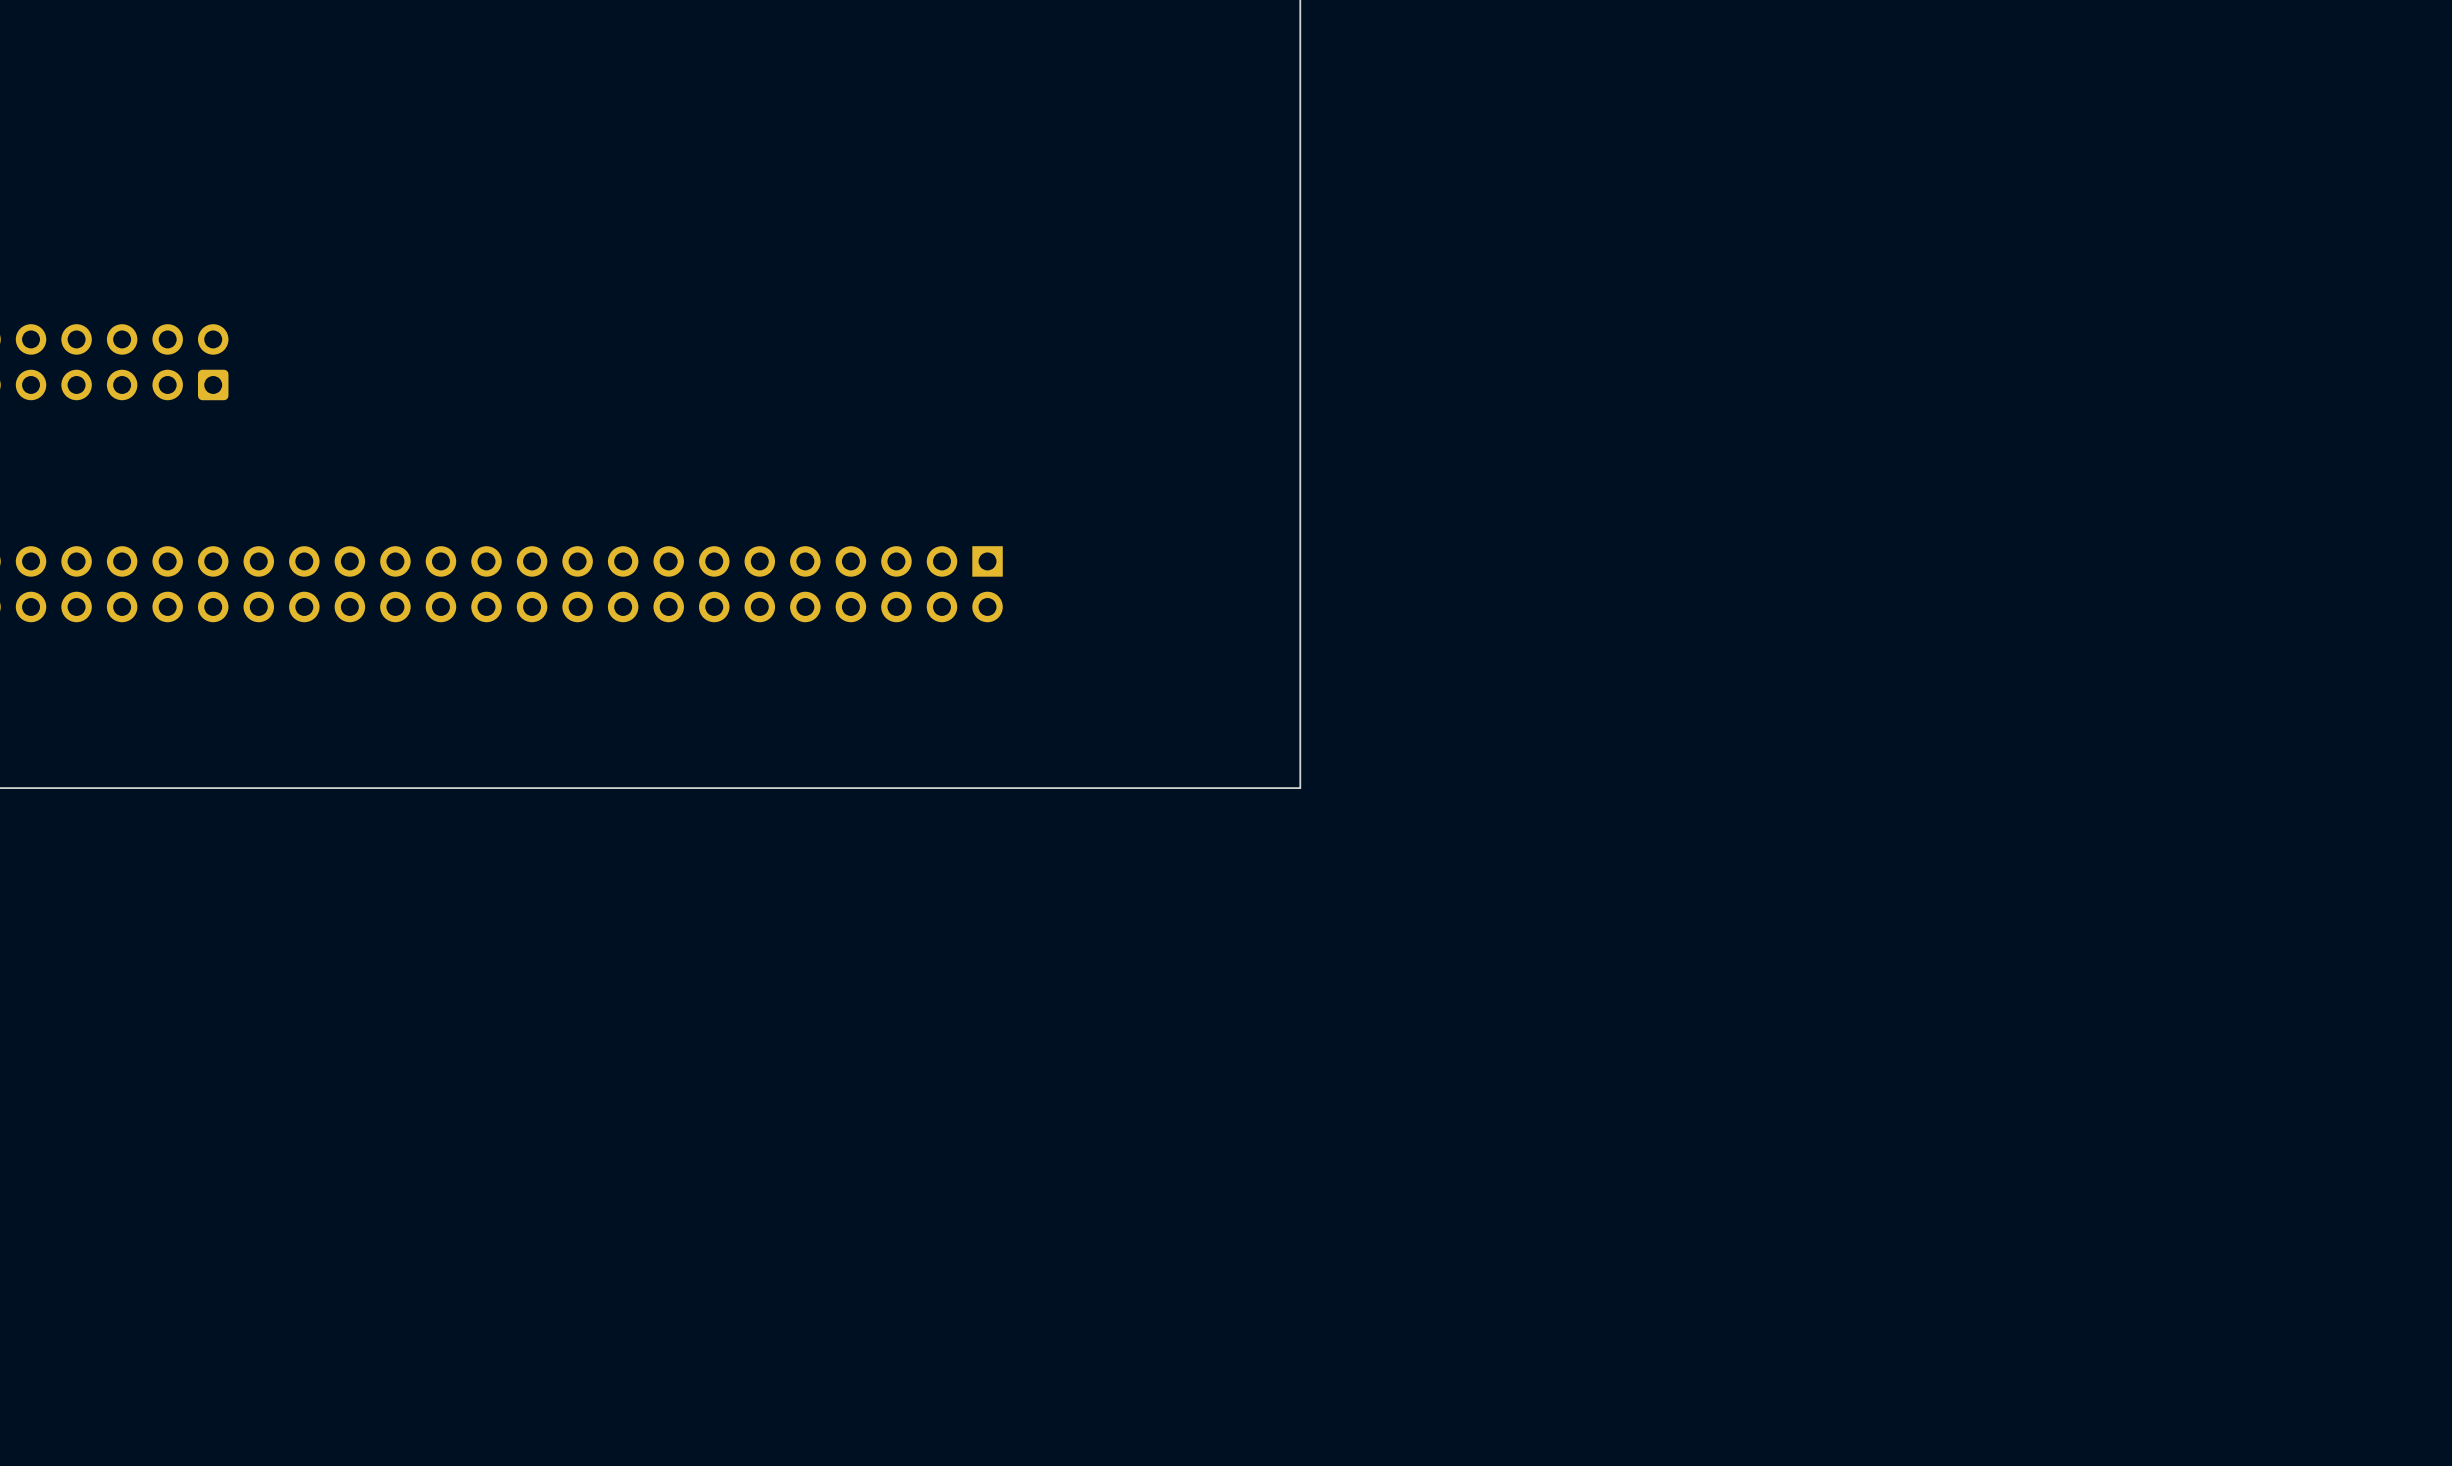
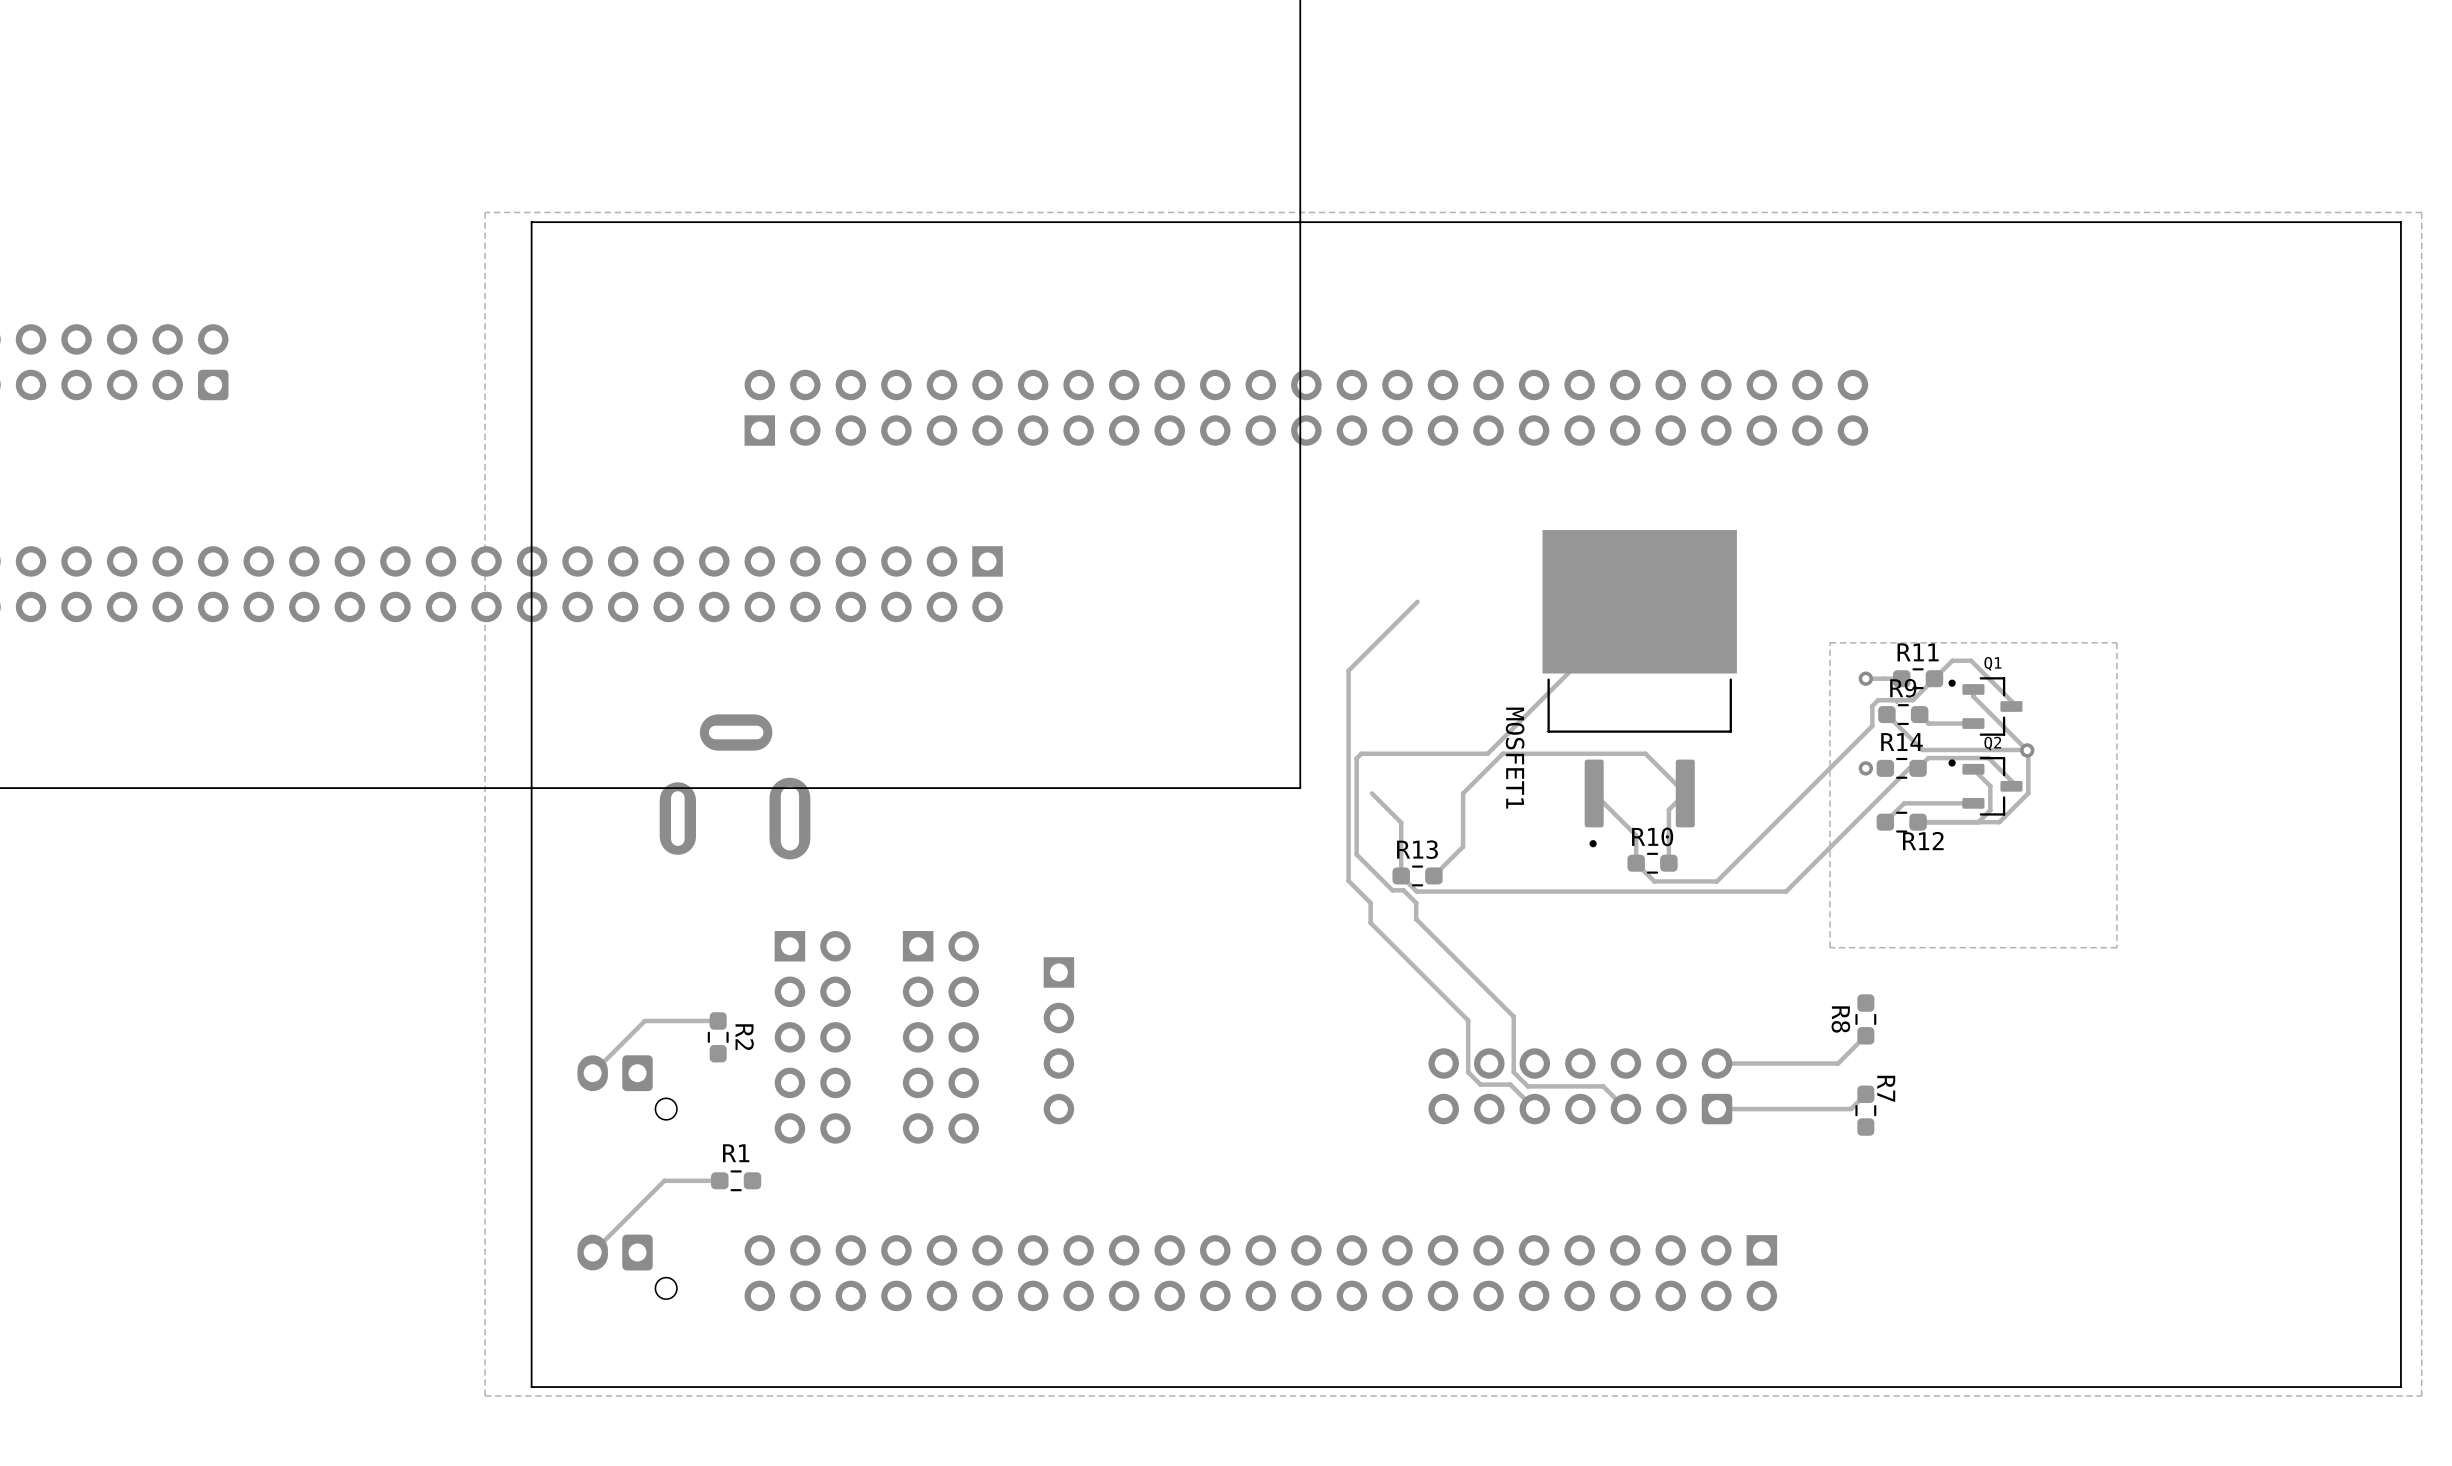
zone outline: none -> (2421, 212) (485, 212) (485, 1395) (2421, 1395) (2421, 212)
board edge: none -> (2400, 222) (2400, 1387) (531, 1387) (531, 222) (2400, 222)
part: none -> (1306, 407)
track: none -> (1417, 601) (1348, 670) (1348, 880) (1370, 903) (1370, 922) (1468, 1020) (1468, 1072) (1480, 1084) (1510, 1084) (1534, 1109)
track: none -> (1639, 601) (1487, 753) (1361, 753) (1356, 758) (1356, 854) (1392, 890) (1403, 890) (1416, 903) (1416, 919) (1513, 1016) (1513, 1072) (1527, 1086) (1603, 1086) (1625, 1109)
zone outline: none -> (2116, 642) (2116, 947) (1829, 947) (1829, 642) (2116, 642)
via: none -> (1865, 678)
track: none -> (1901, 678) (1865, 678)
R11: none -> (1918, 678)
MOSFET1: none -> (1639, 688)
track: none -> (1973, 689) (1973, 696) (2028, 751) (2028, 793) (1999, 822) (1918, 822)
Q1: none -> (1985, 706)
track: none -> (2011, 706) (2011, 701) (1971, 660) (1952, 660) (1912, 700) (1878, 700) (1872, 706) (1872, 726) (1716, 881) (1654, 881) (1636, 863) (1636, 835) (1594, 793)
track: none -> (1886, 714) (1922, 749) (2026, 749)
R9: none -> (1903, 714)
track: none -> (1919, 714) (1928, 723) (1973, 723)
via: none -> (2027, 750)
via: none -> (1865, 768)
R14: none -> (1901, 768)
track: none -> (1973, 769) (1990, 786) (1990, 810) (1978, 822)
part: none -> (735, 786)
Q2: none -> (1985, 786)
track: none -> (2011, 786) (2011, 780) (1988, 758) (1928, 758) (1918, 768) (1909, 768) (1786, 891) (1416, 891) (1401, 875) (1401, 822) (1372, 793)
track: none -> (1973, 803) (1904, 803) (1885, 822)
R12: none -> (1901, 822)
R10: none -> (1652, 863)
track: none -> (1668, 863) (1668, 809) (1685, 793) (1645, 753) (1502, 753) (1463, 793) (1463, 846) (1433, 875)
R13: none -> (1417, 875)
R8: none -> (1865, 1019)
track: none -> (718, 1020) (644, 1020) (592, 1073)
track: none -> (1865, 1035) (1838, 1063) (1717, 1063)
R2: none -> (718, 1037)
part: none -> (812, 1037)
part: none -> (940, 1037)
part: none -> (1058, 1040)
part: none -> (1580, 1086)
part: none -> (627, 1087)
track: none -> (1865, 1094) (1851, 1109) (1717, 1109)
R7: none -> (1865, 1110)
track: none -> (719, 1180) (664, 1180) (592, 1252)
R1: none -> (736, 1180)
part: none -> (627, 1266)
part: none -> (1260, 1273)

